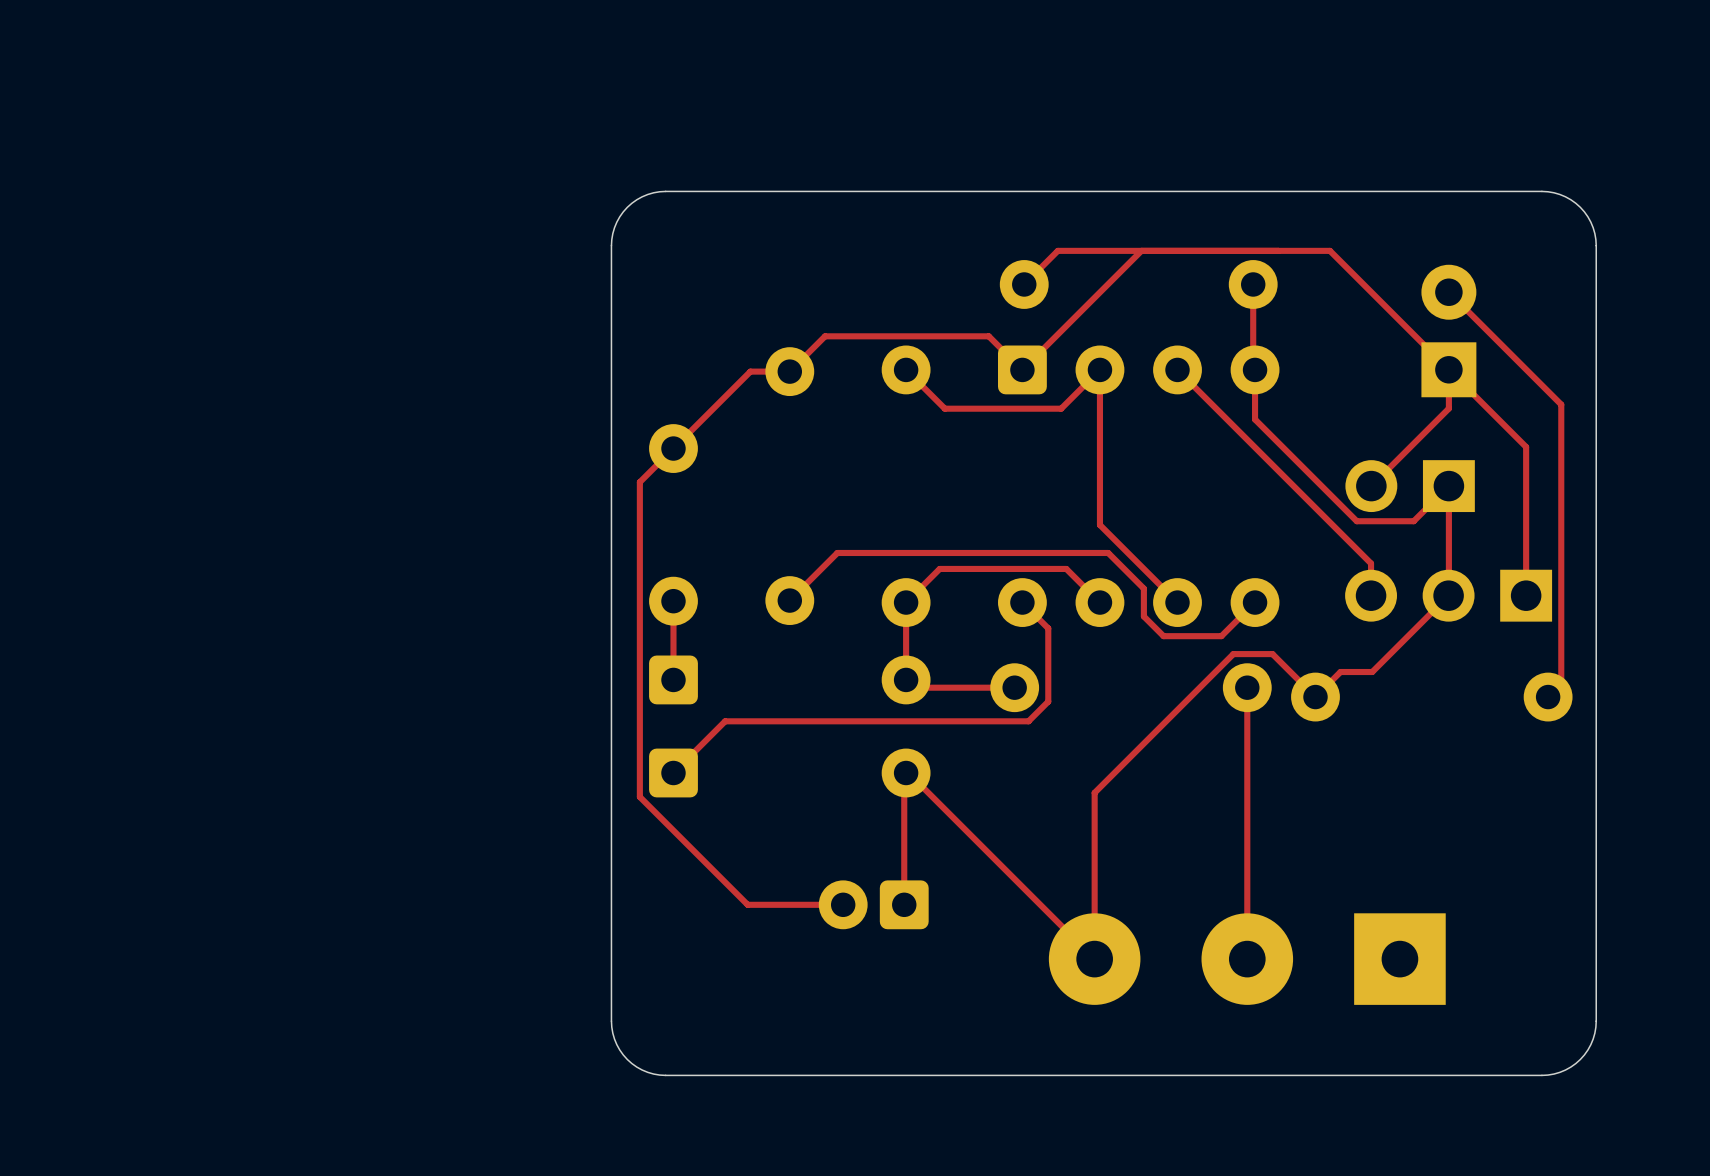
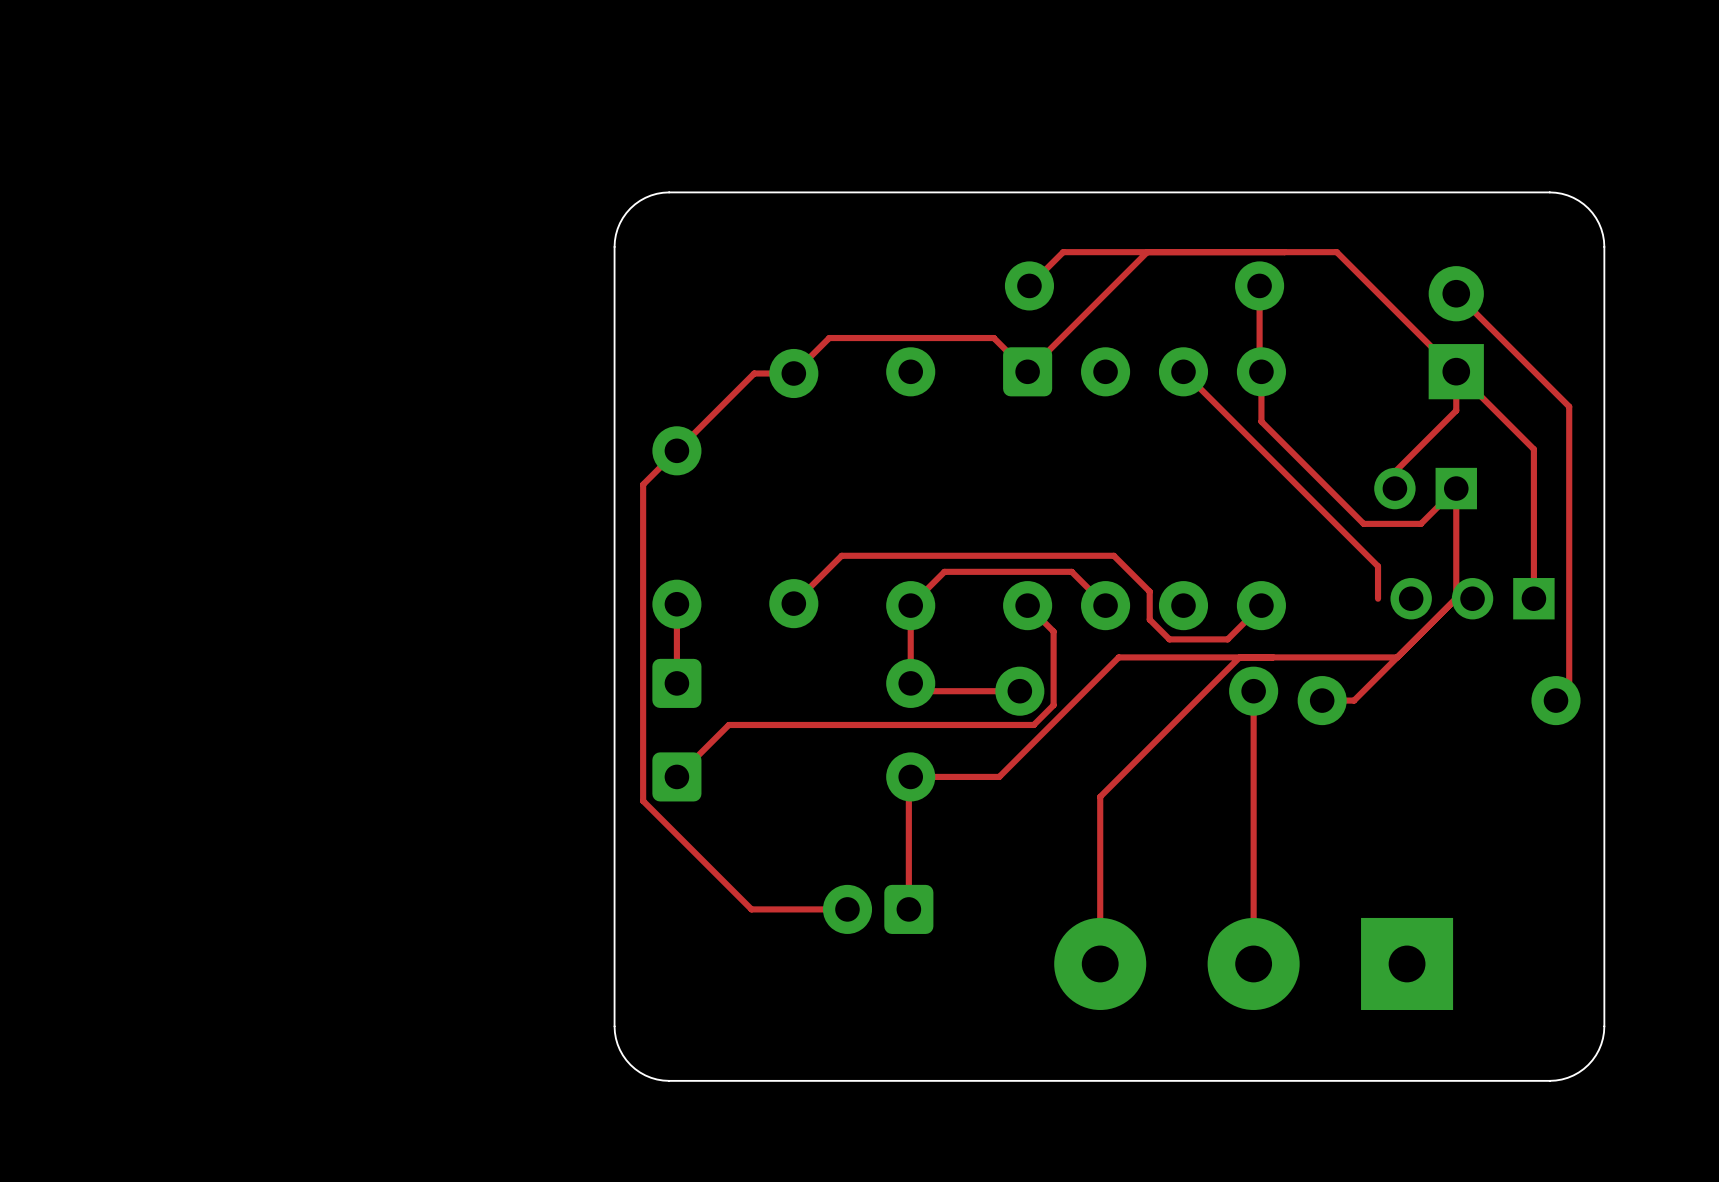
top track: (906, 369) (944, 408) (1061, 408) (1099, 369) (1099, 525) (1177, 602) -> none
part footprint: [1345, 460, 1475, 513] -> [1374, 467, 1477, 510]
part footprint: [1345, 569, 1553, 622] -> [1390, 578, 1555, 620]
top track: (1272, 654) (1315, 697) (1340, 672) (1372, 672) -> (1279, 657) (1397, 657)
top track: none -> (1379, 675) (1354, 700) (1322, 700)
top track: (908, 772) (1094, 959) -> (913, 776) (999, 776) (1118, 657) (1239, 657)

